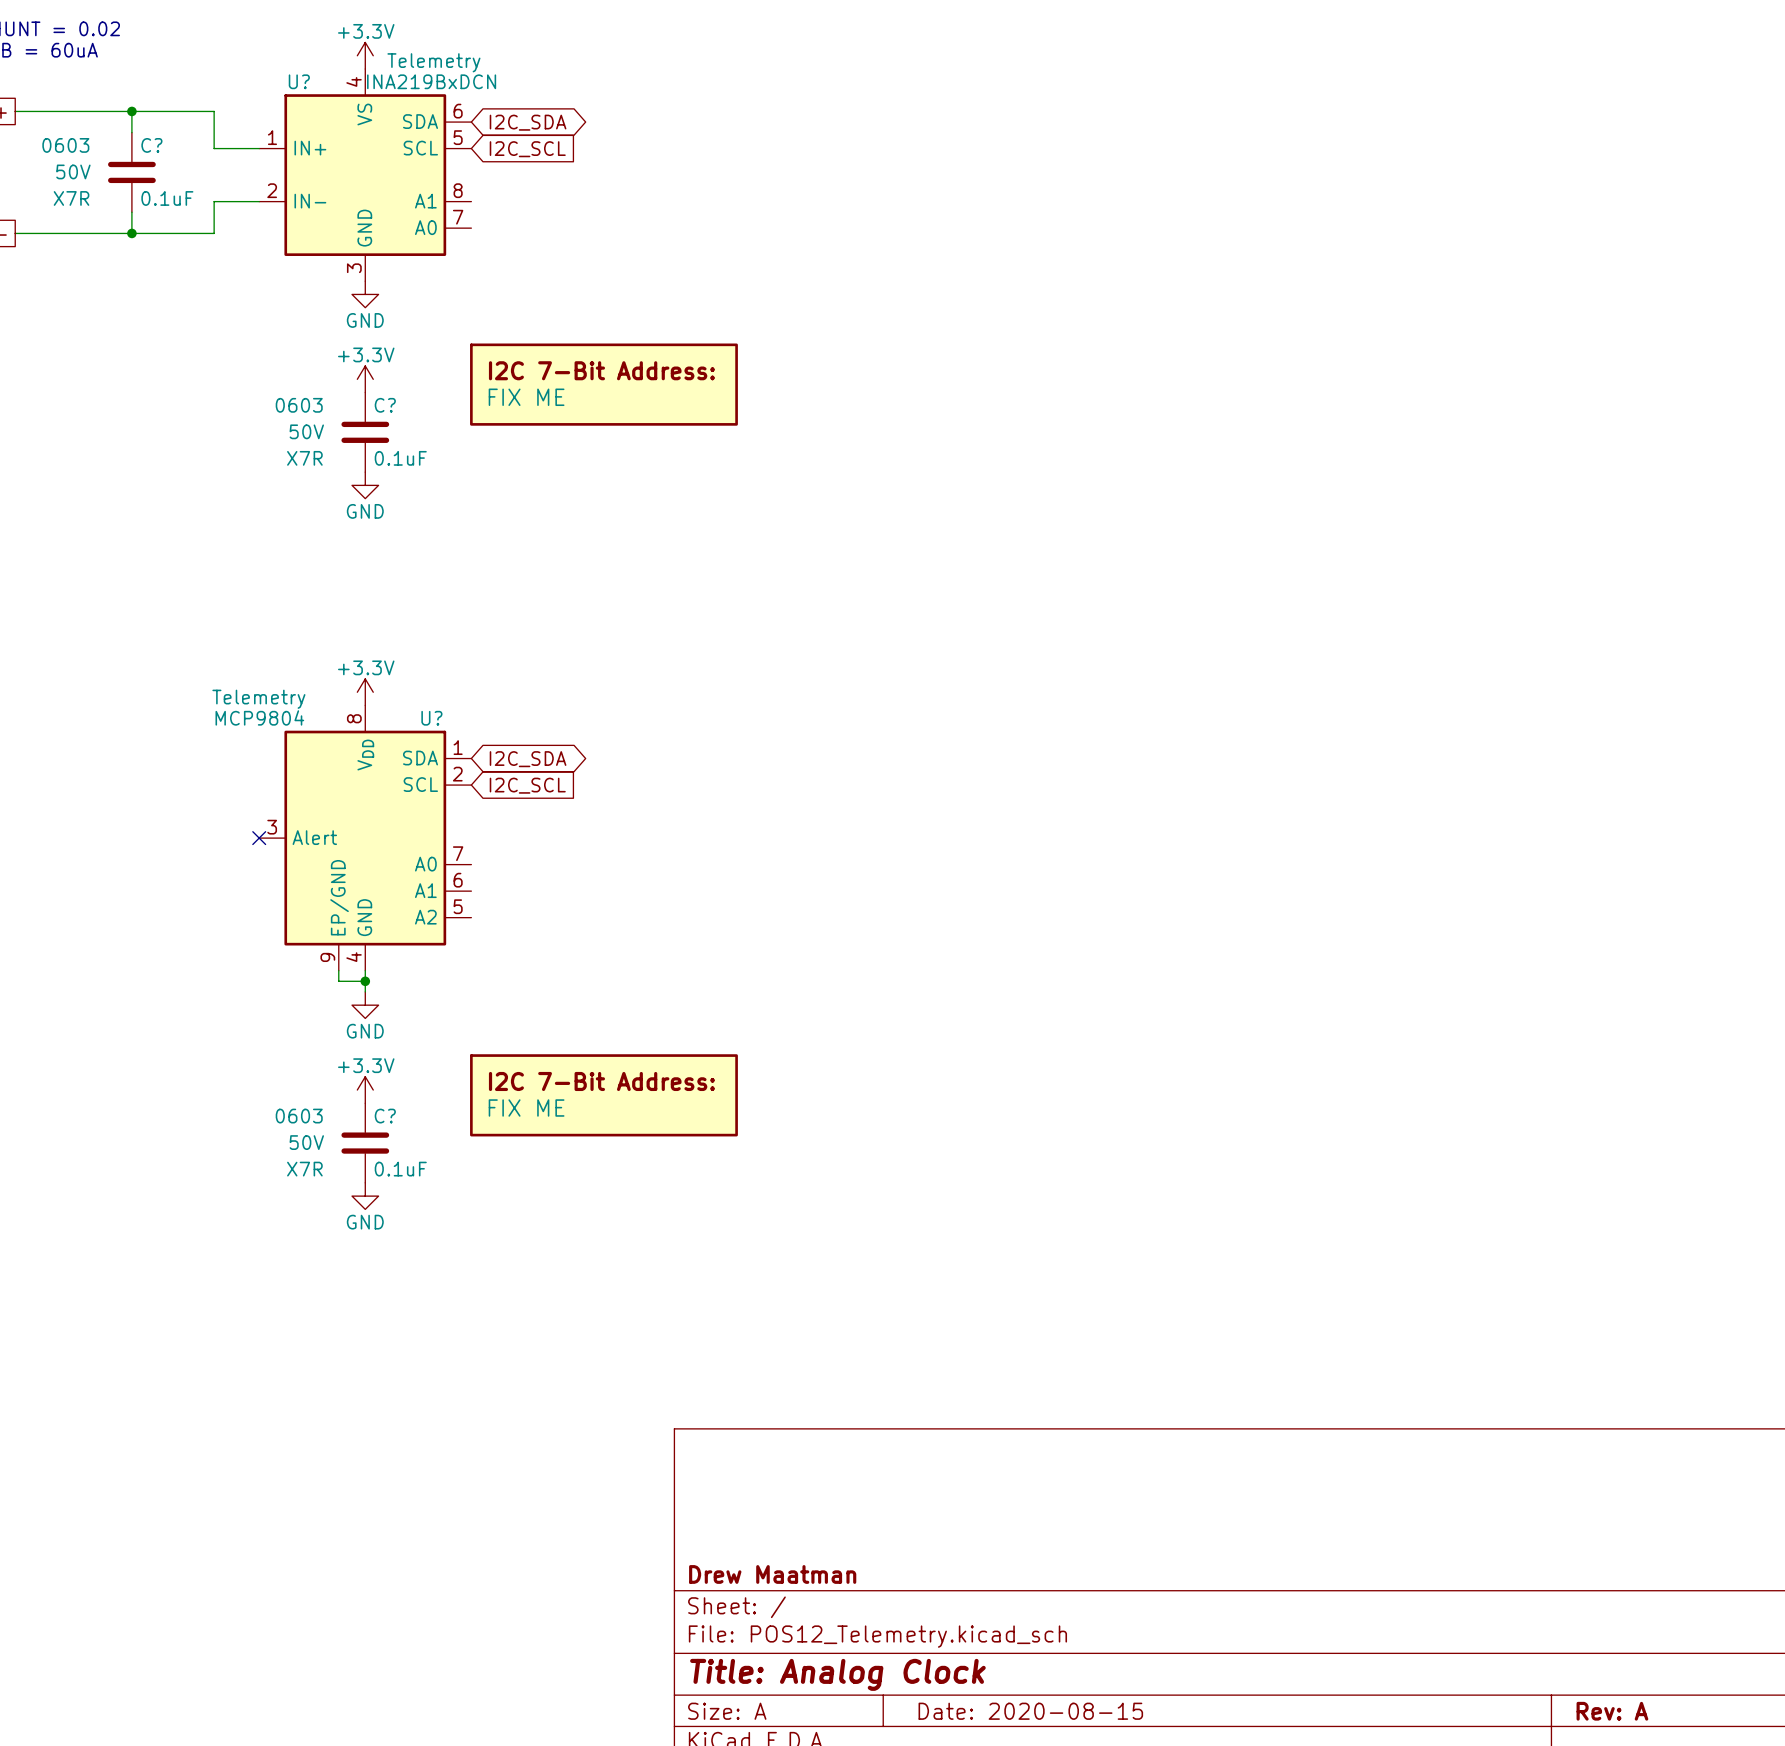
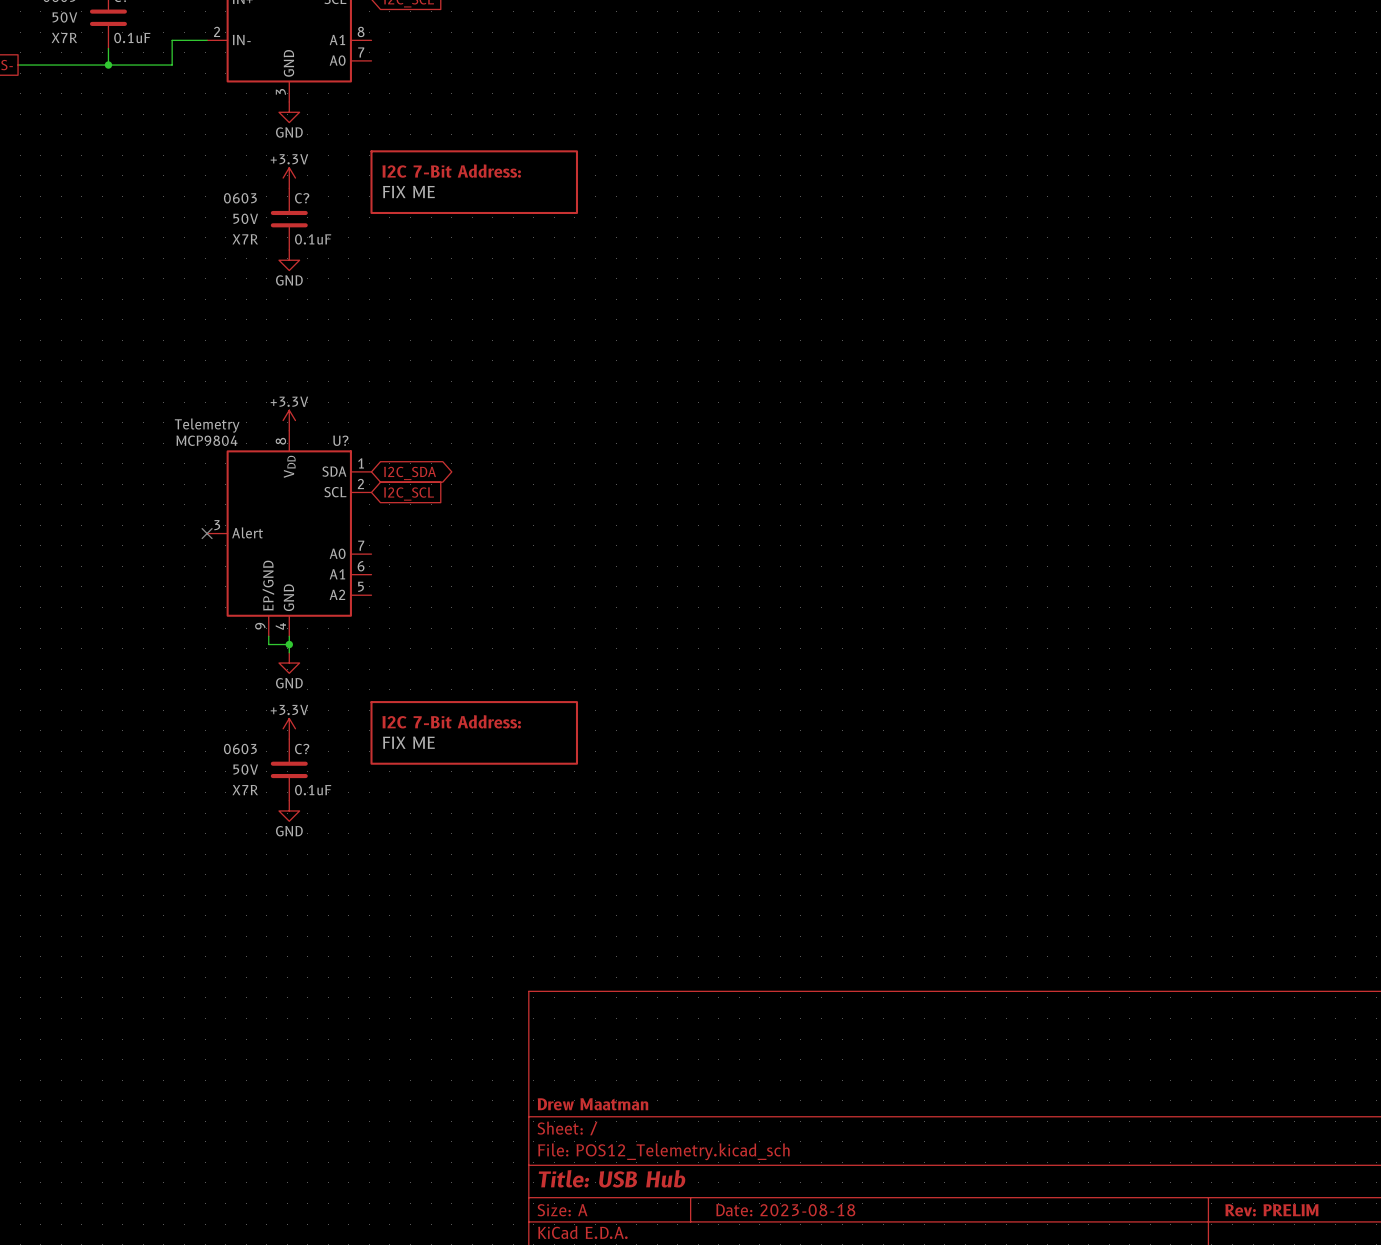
title block: Title: Analog Clock (837, 1674) -> Title: USB Hub (612, 1178)
title block: Date: 2020-08-15 (1030, 1711) -> Date: 2023-08-18 (785, 1210)
title block: Rev: A (1612, 1711) -> Rev: PRELIM (1271, 1210)

